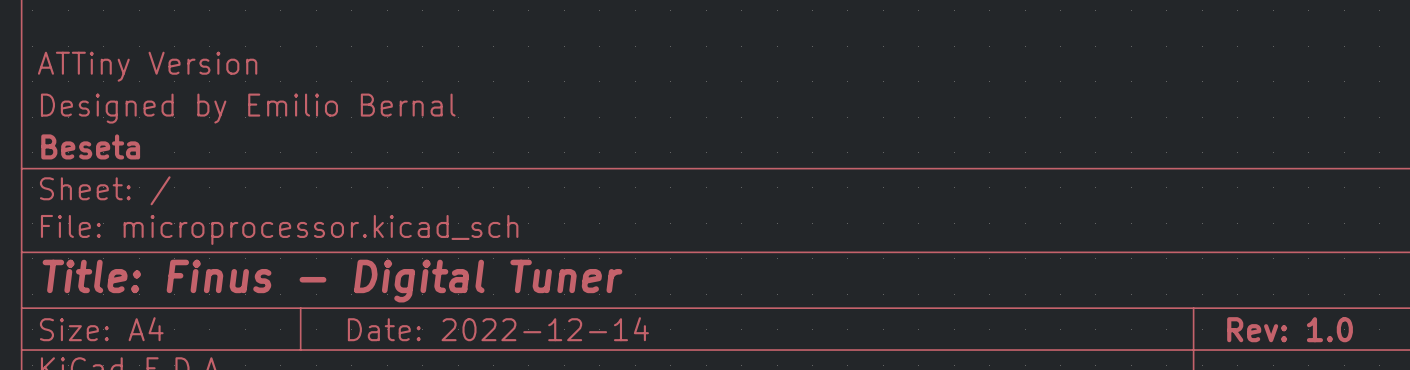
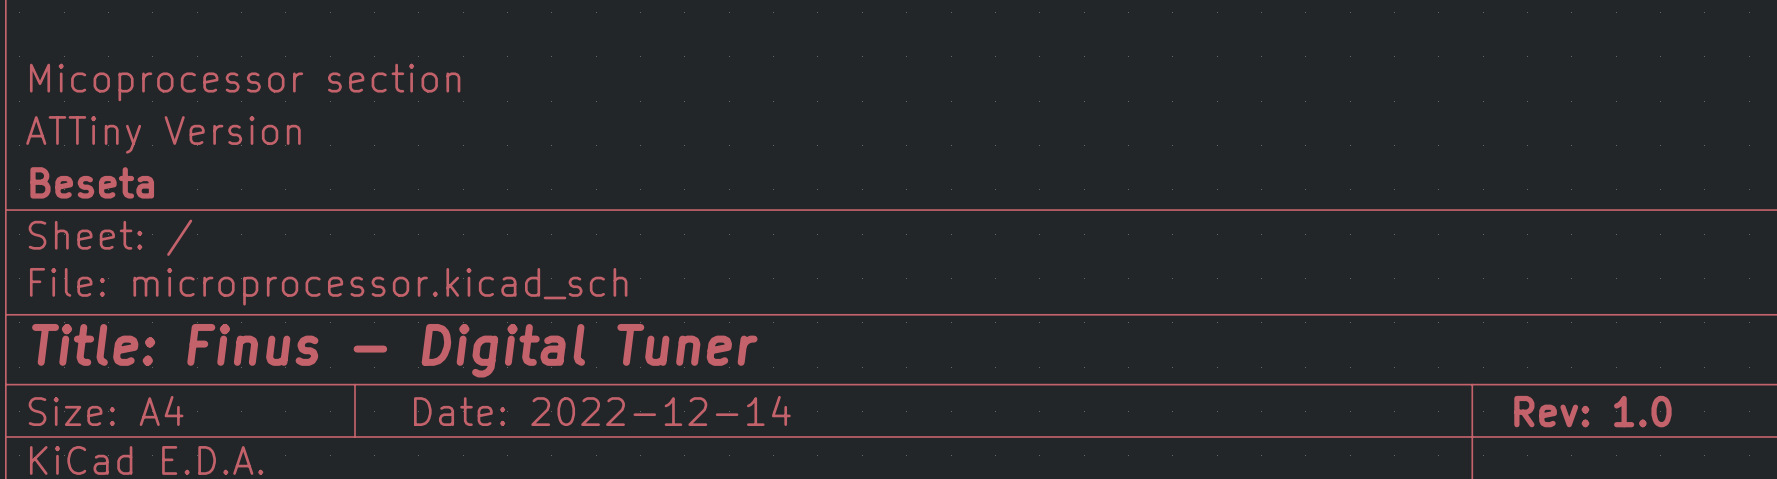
title block: ATTiny Version (147, 66) -> Micoprocessor section (245, 82)
title block: Designed by Emilio Bernal (248, 108) -> ATTiny Version (163, 134)

